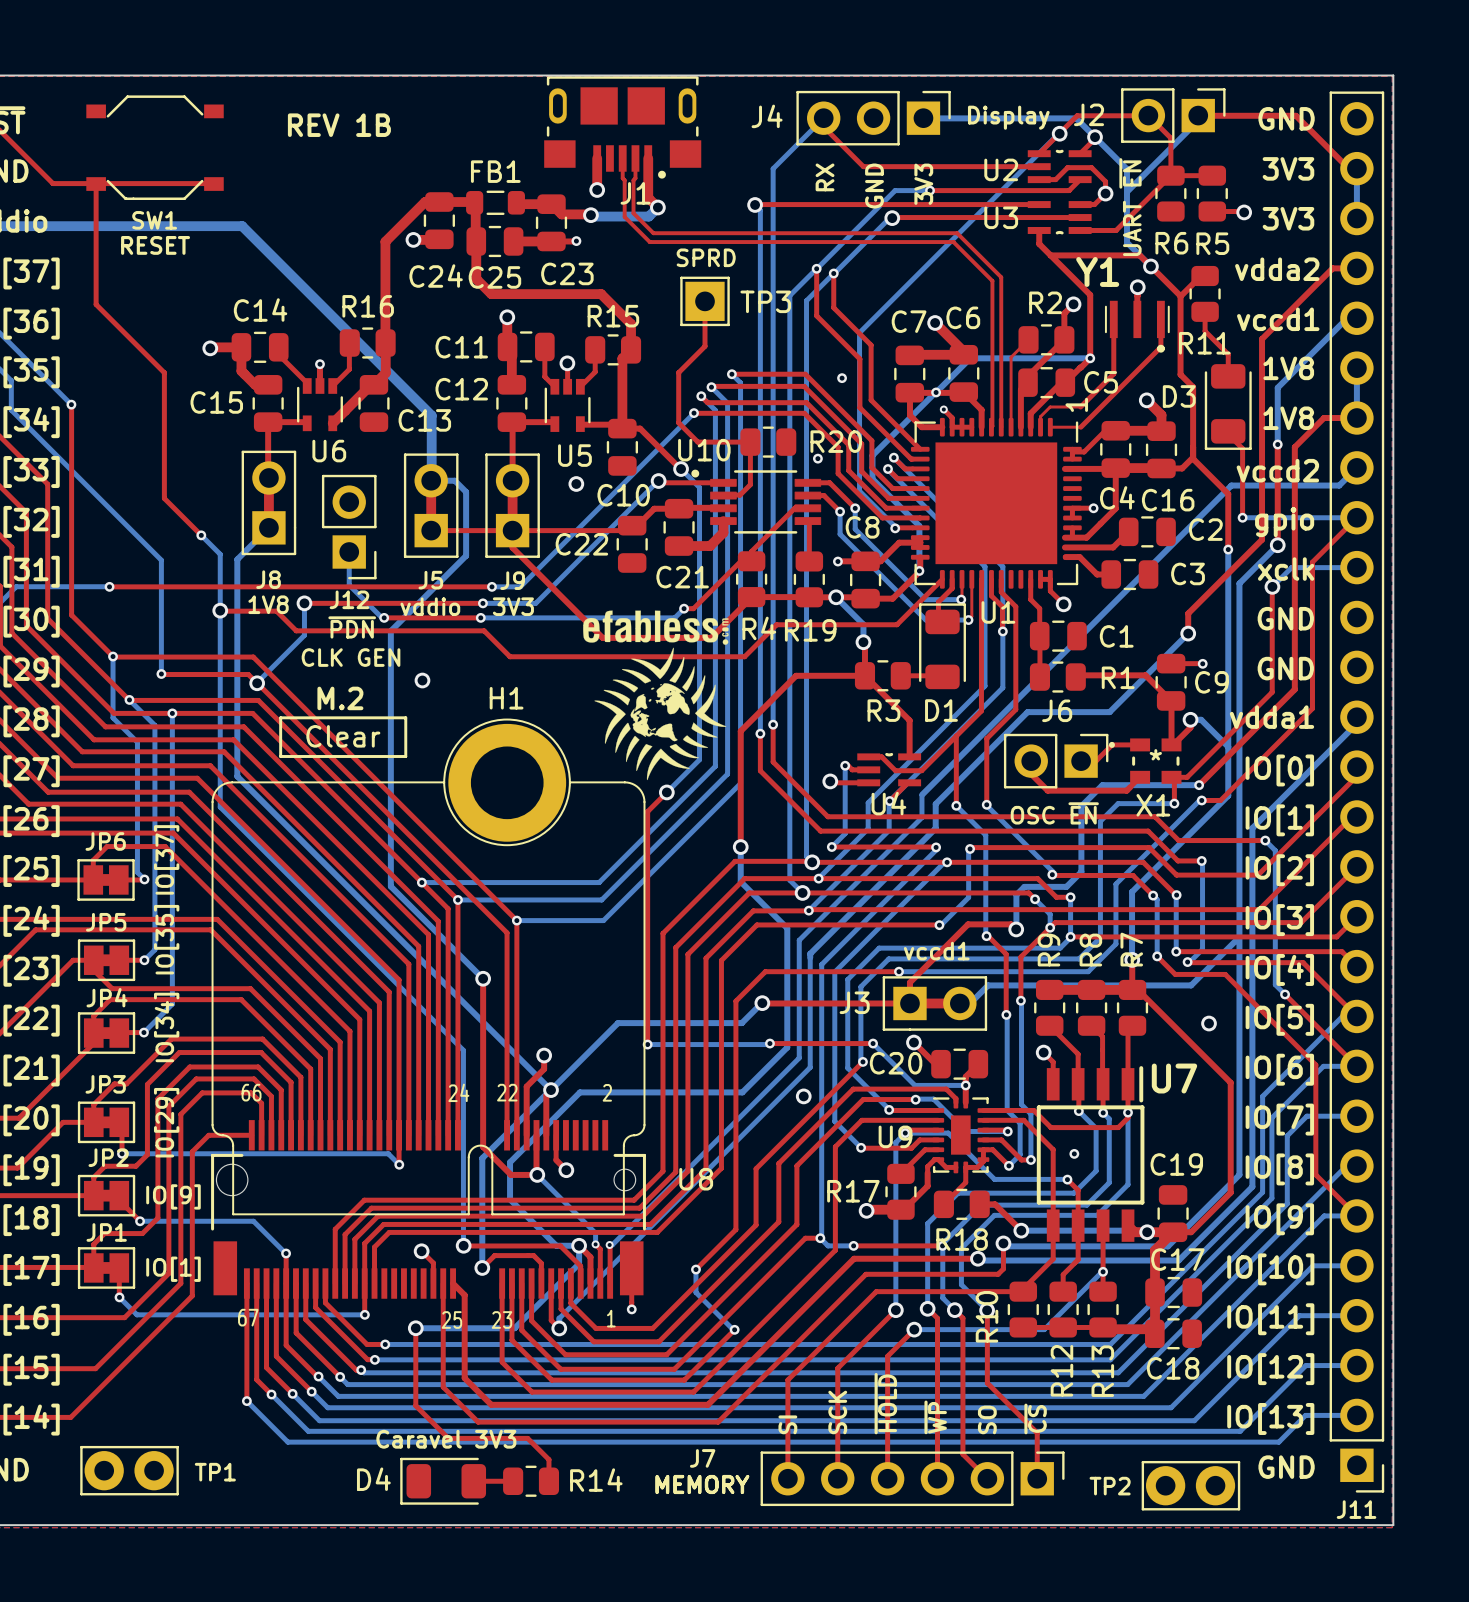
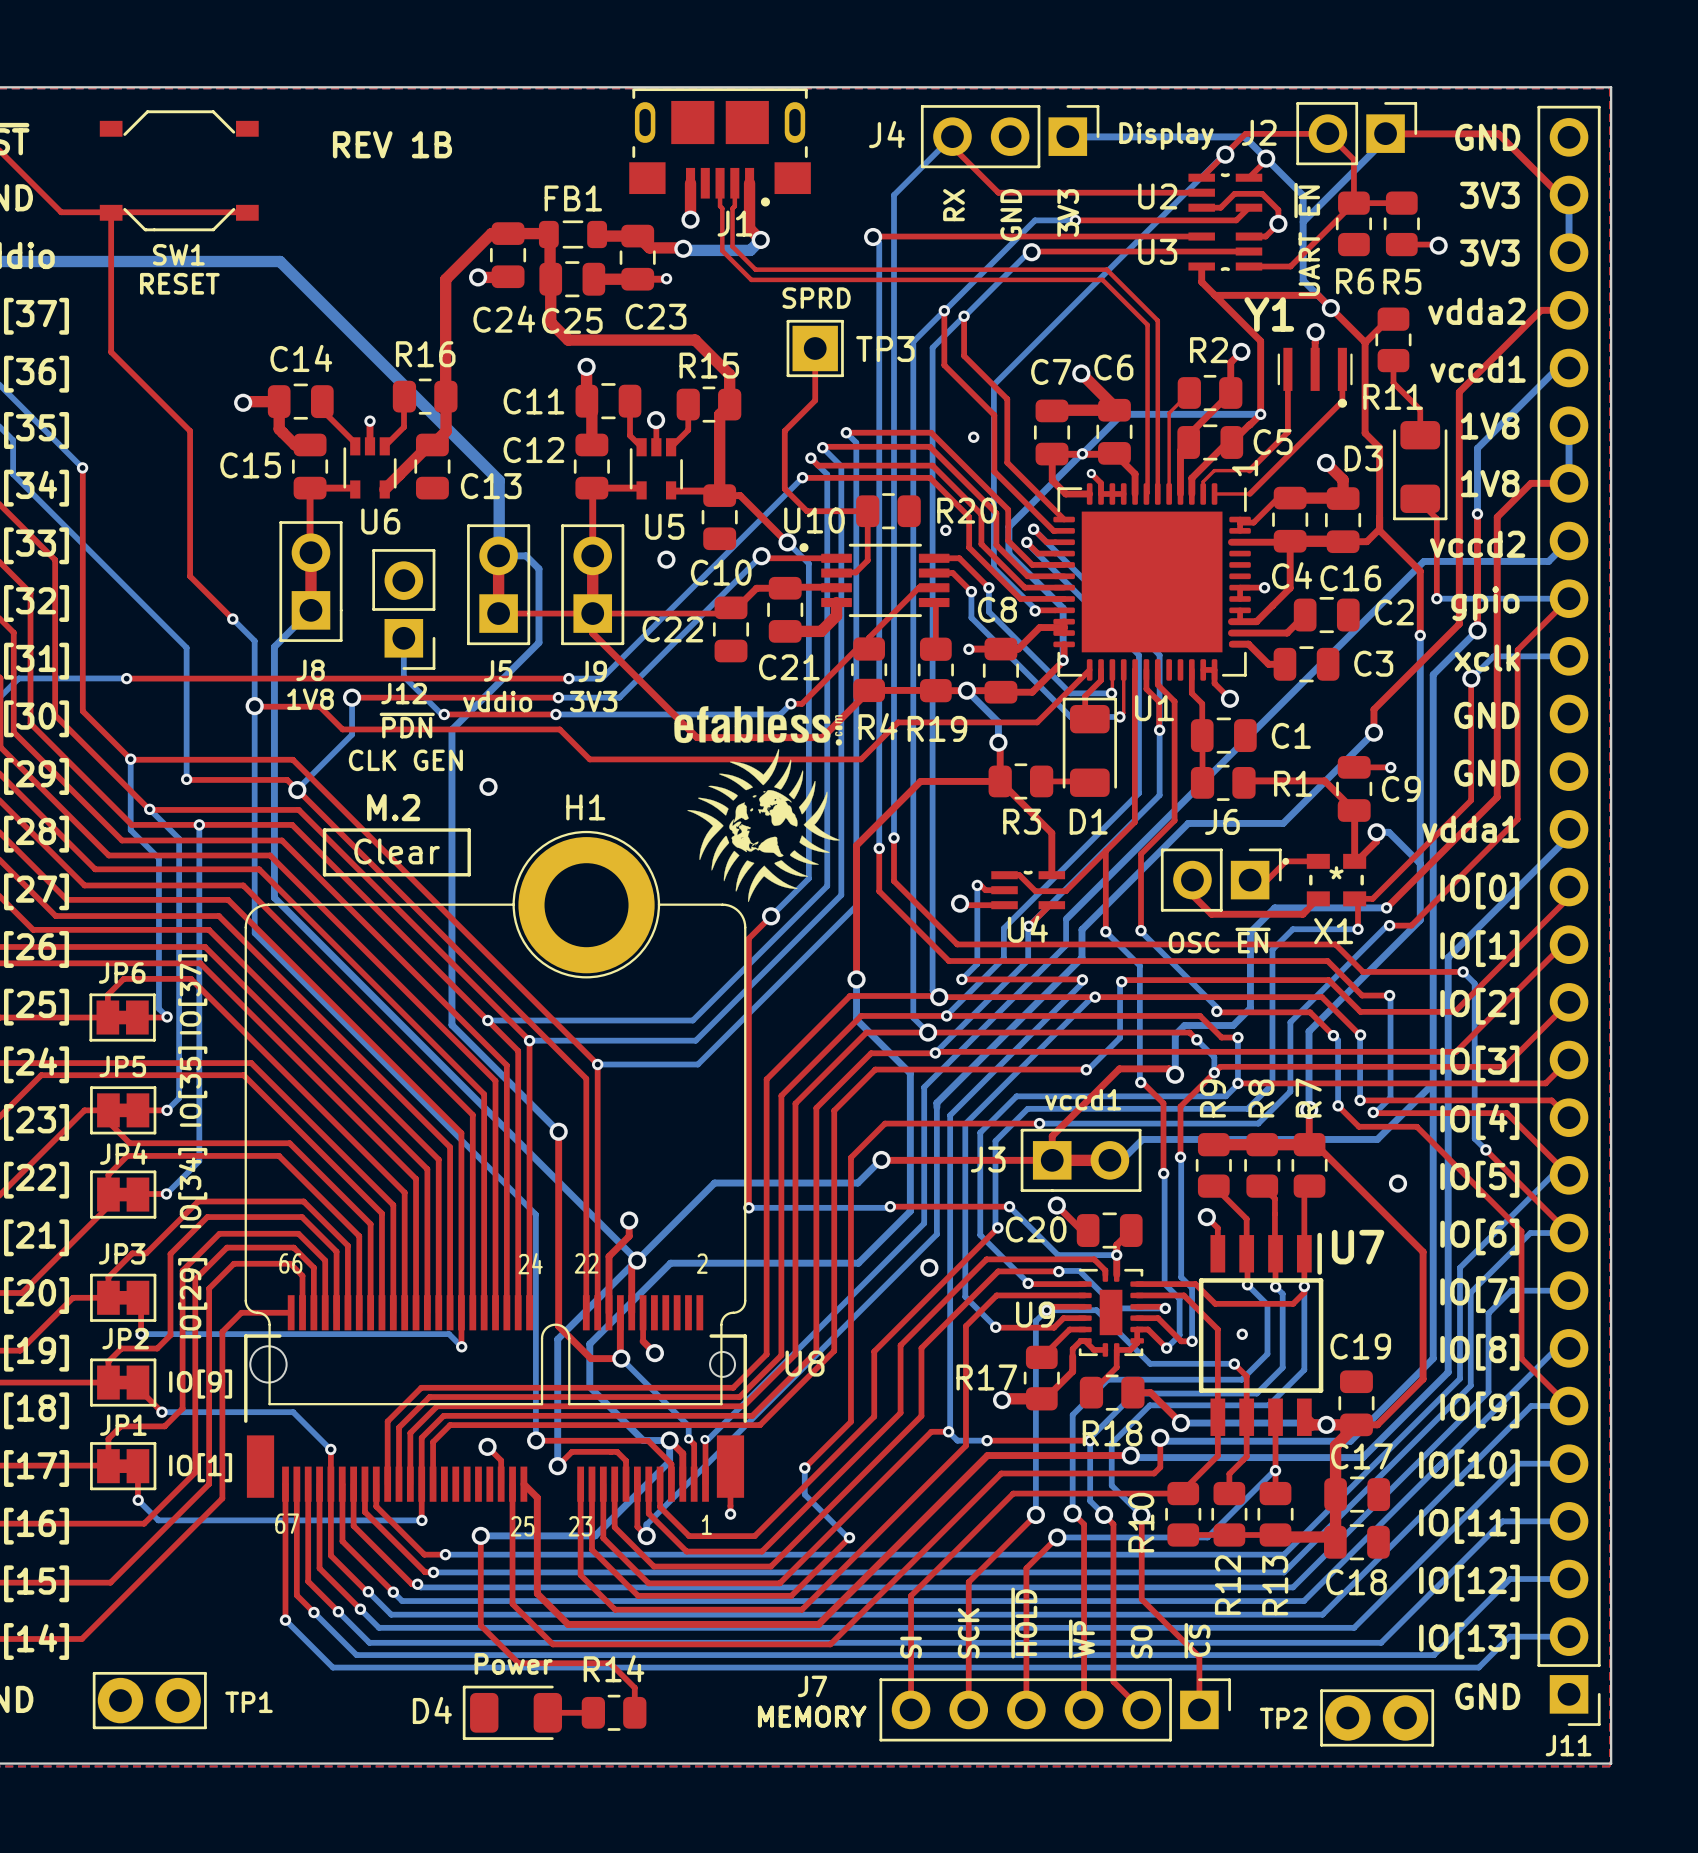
text: Caravel 3V3 (446, 1439) -> Power (513, 1663)
R14 name position: R14 (596, 1480) -> R14 (614, 1668)

